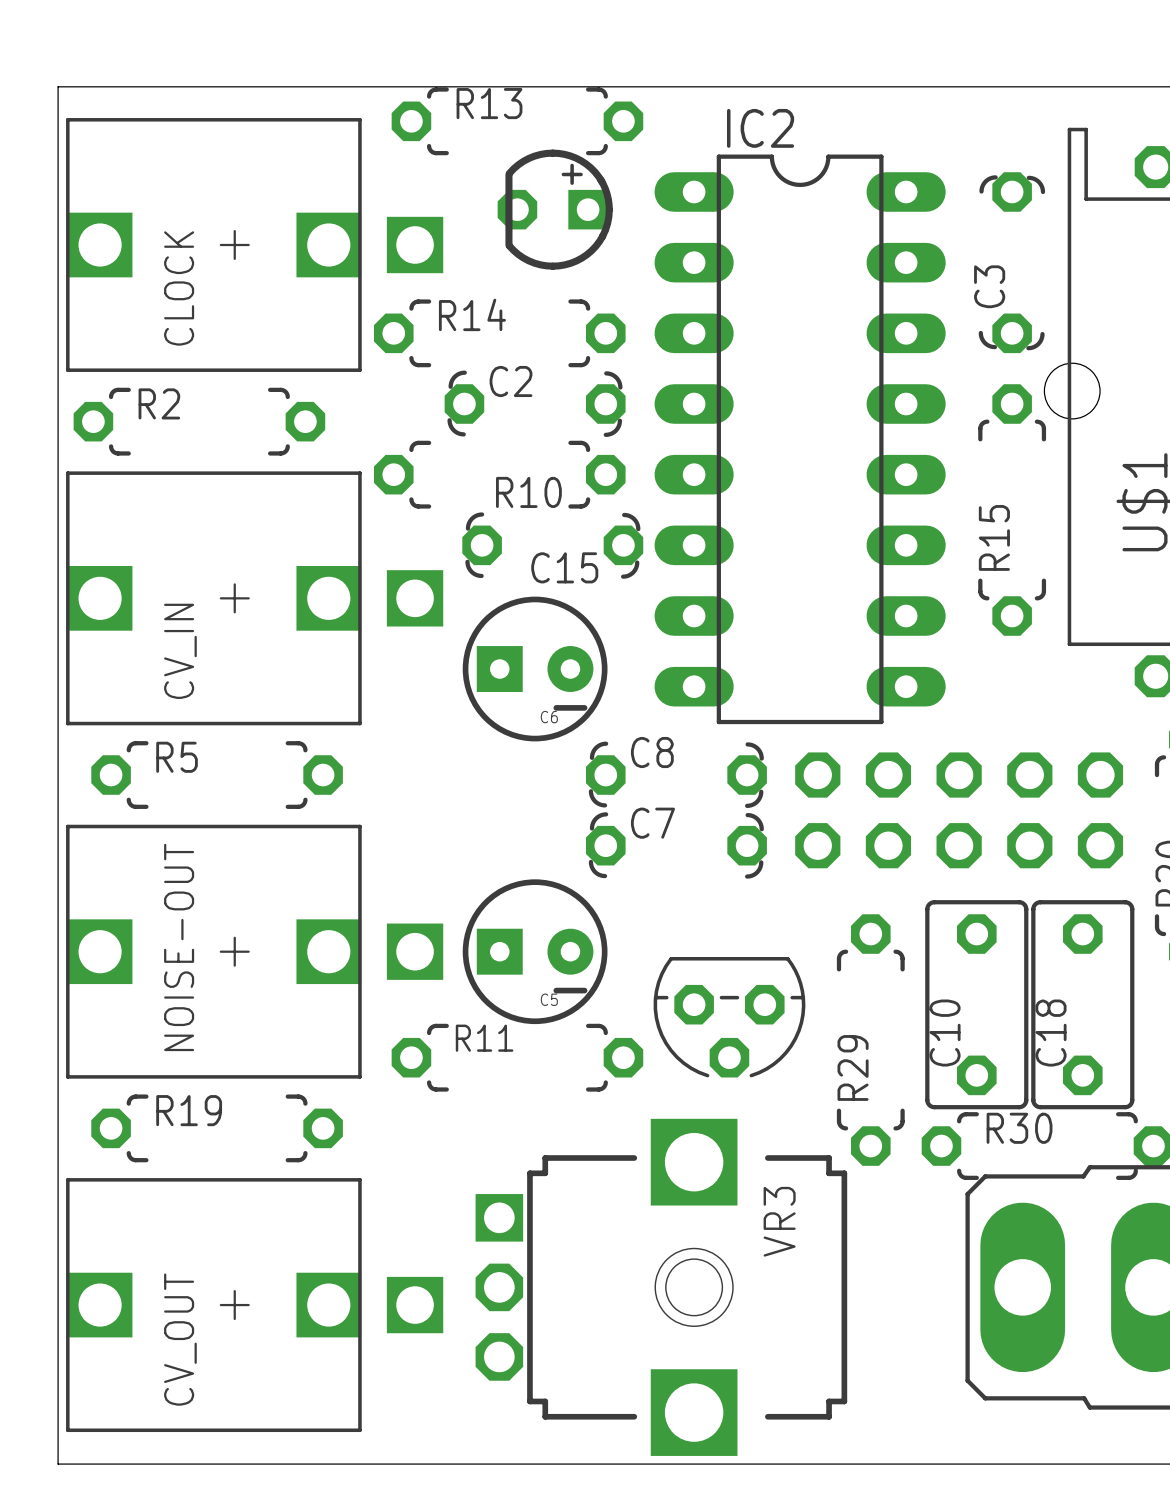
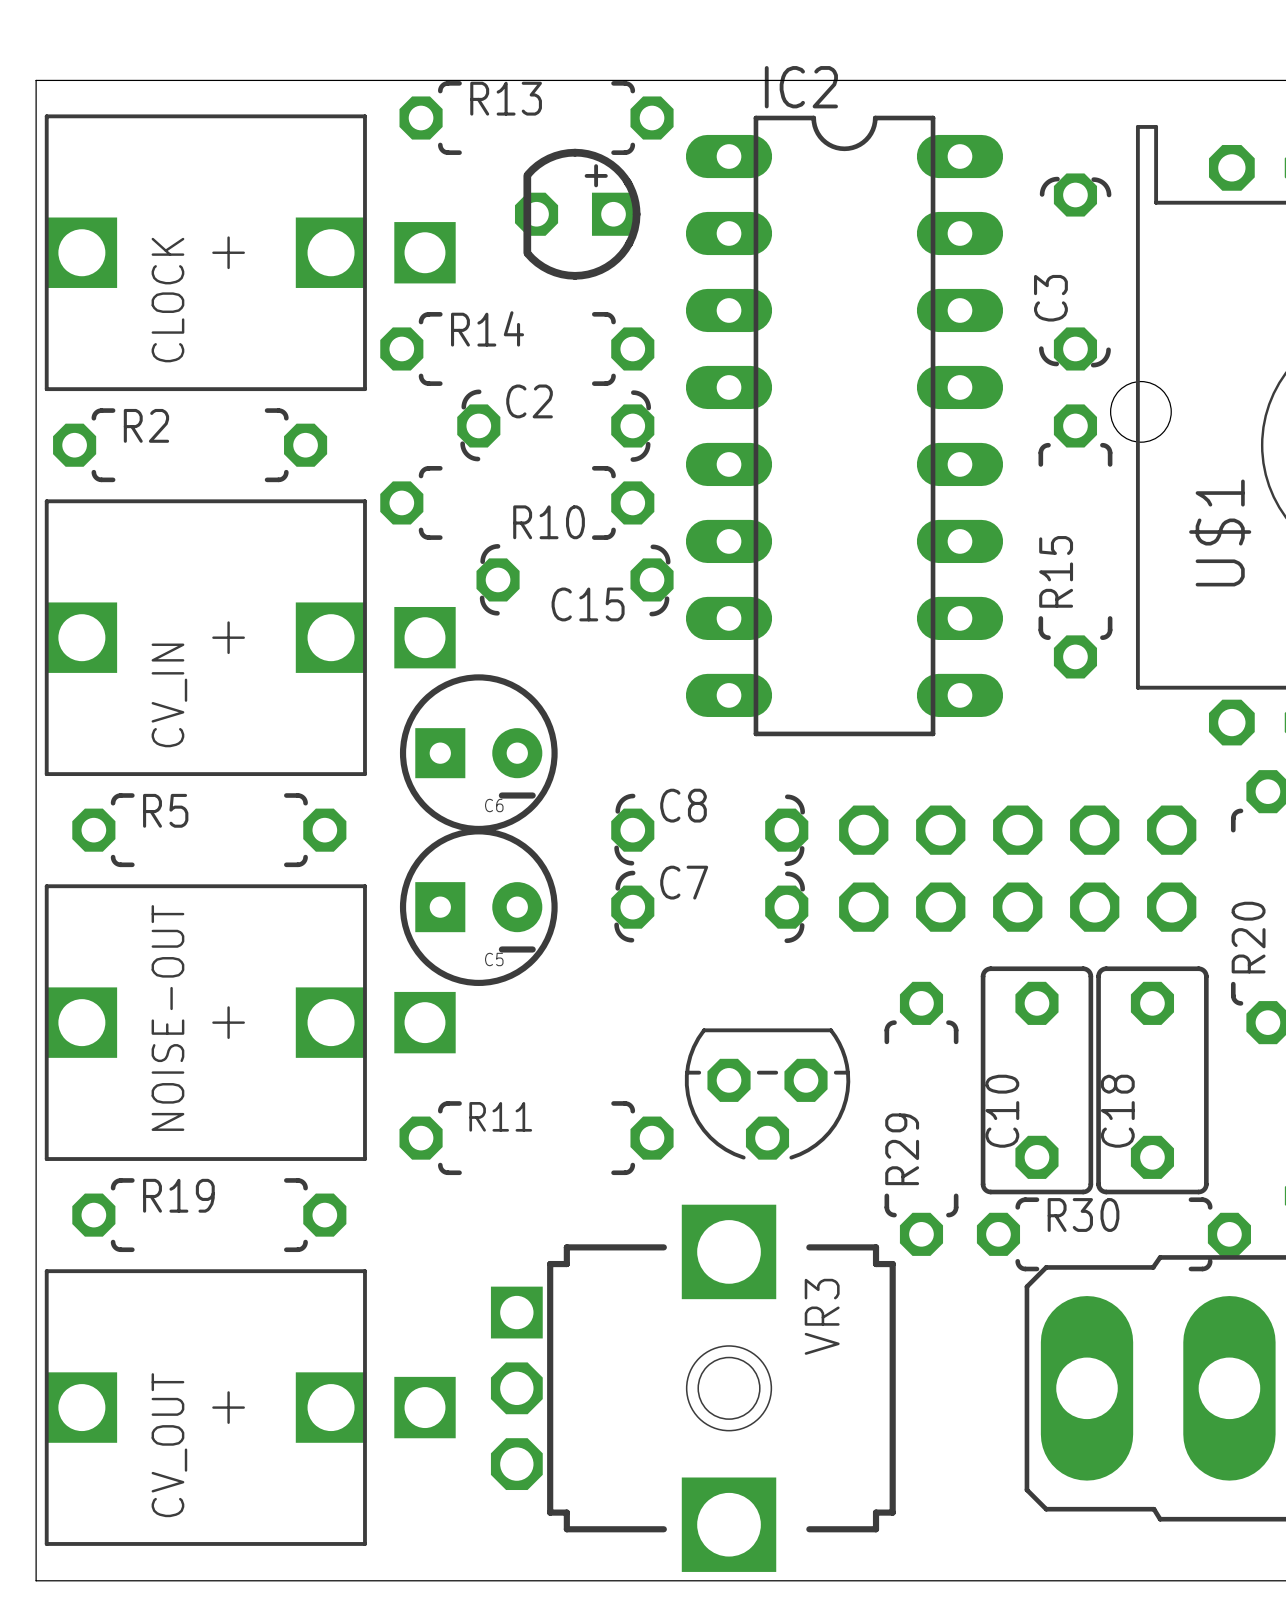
IC2 position: (800, 439) -> (844, 425)
C6 position: (535, 669) -> (478, 753)
C5 position: (535, 951) -> (478, 907)

